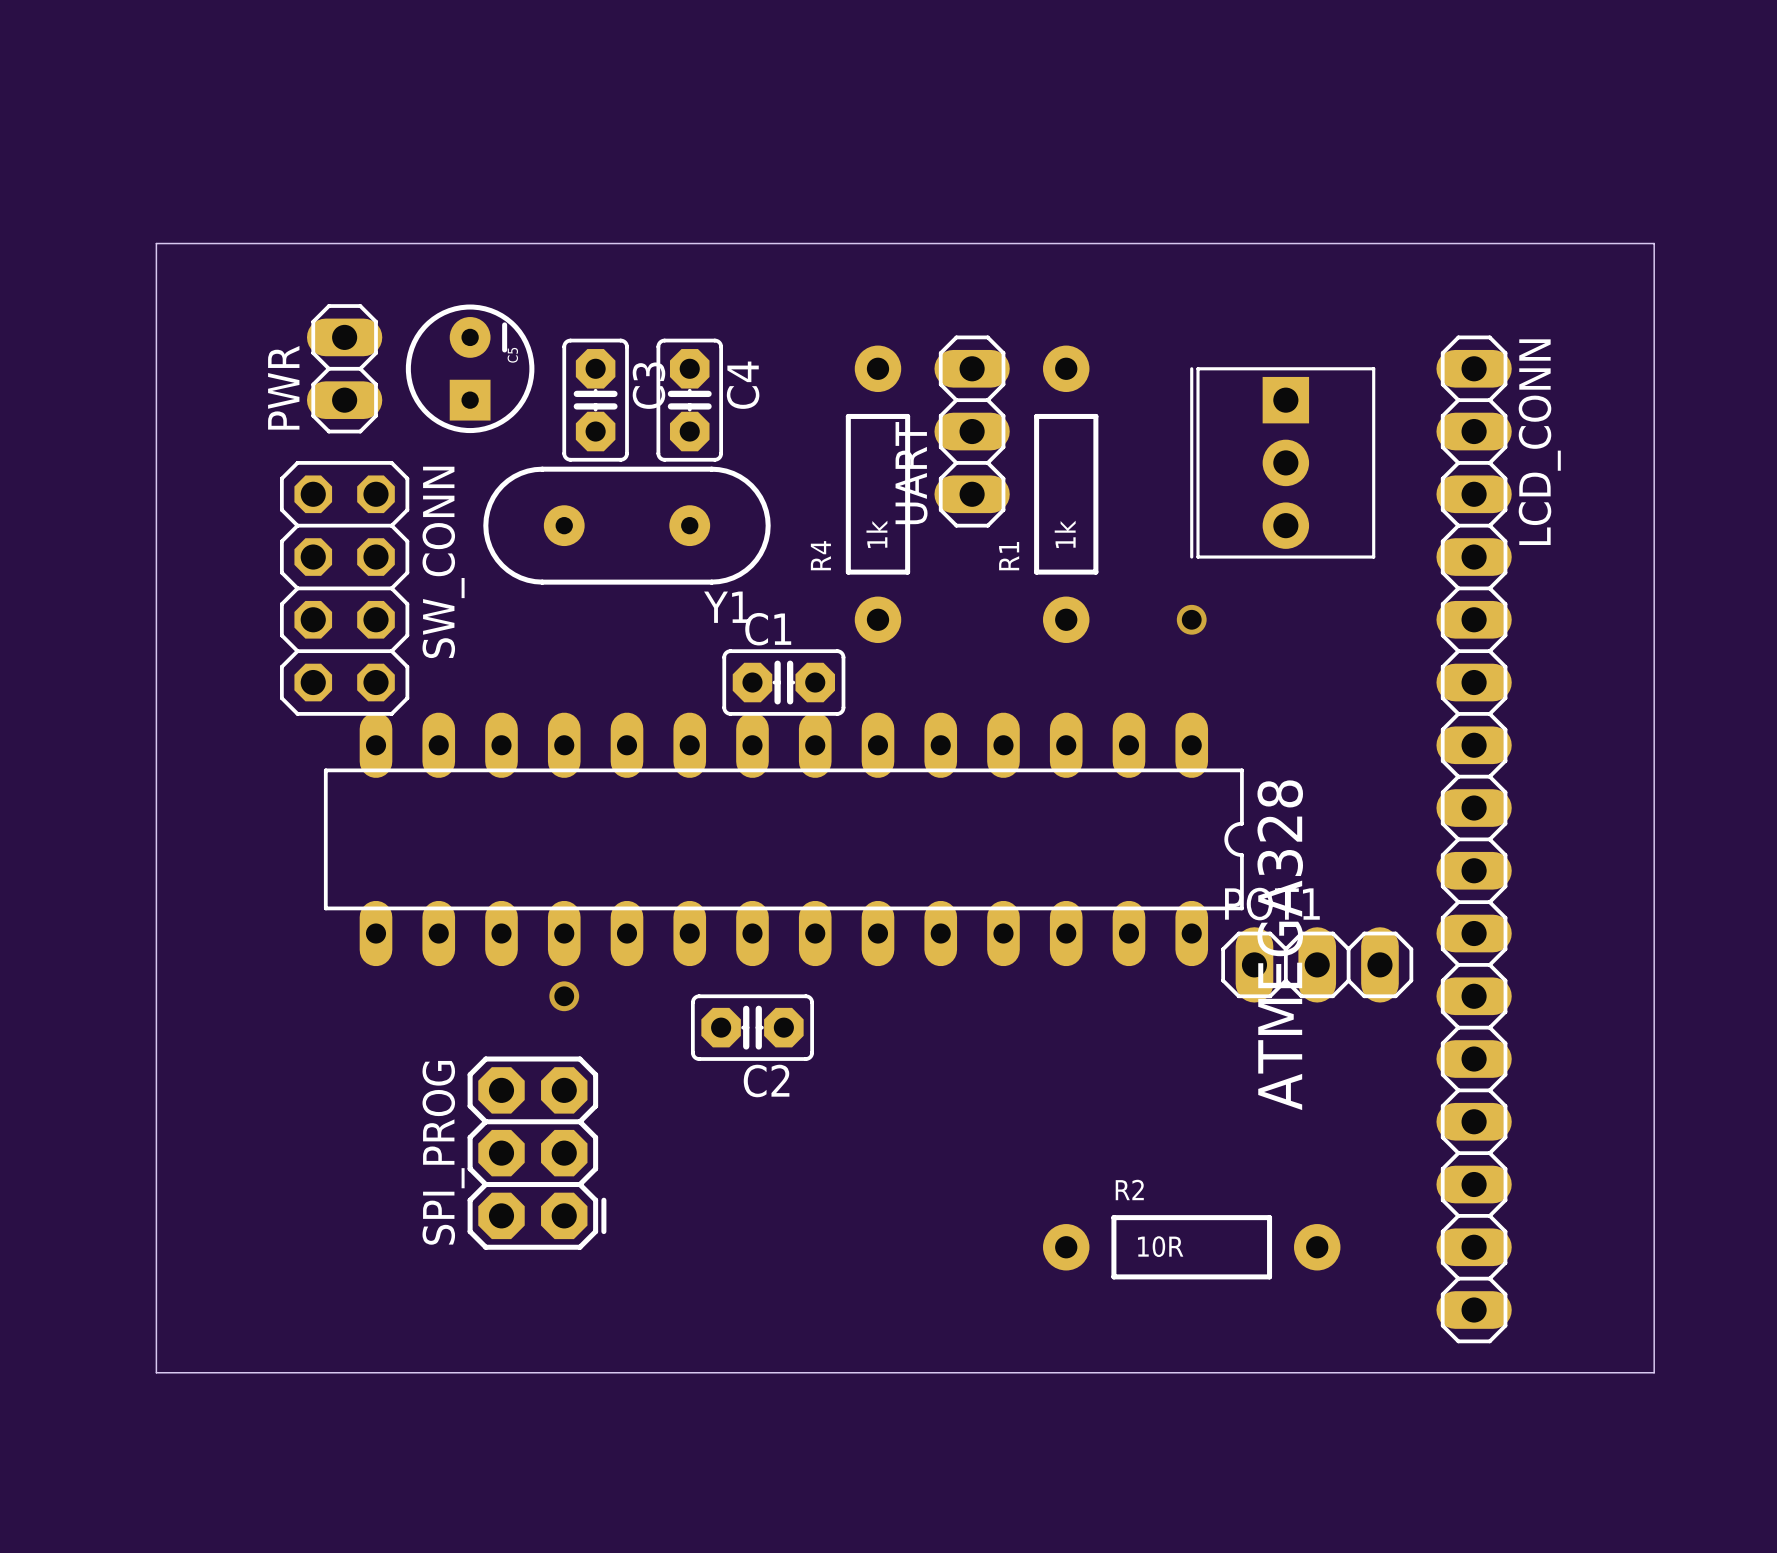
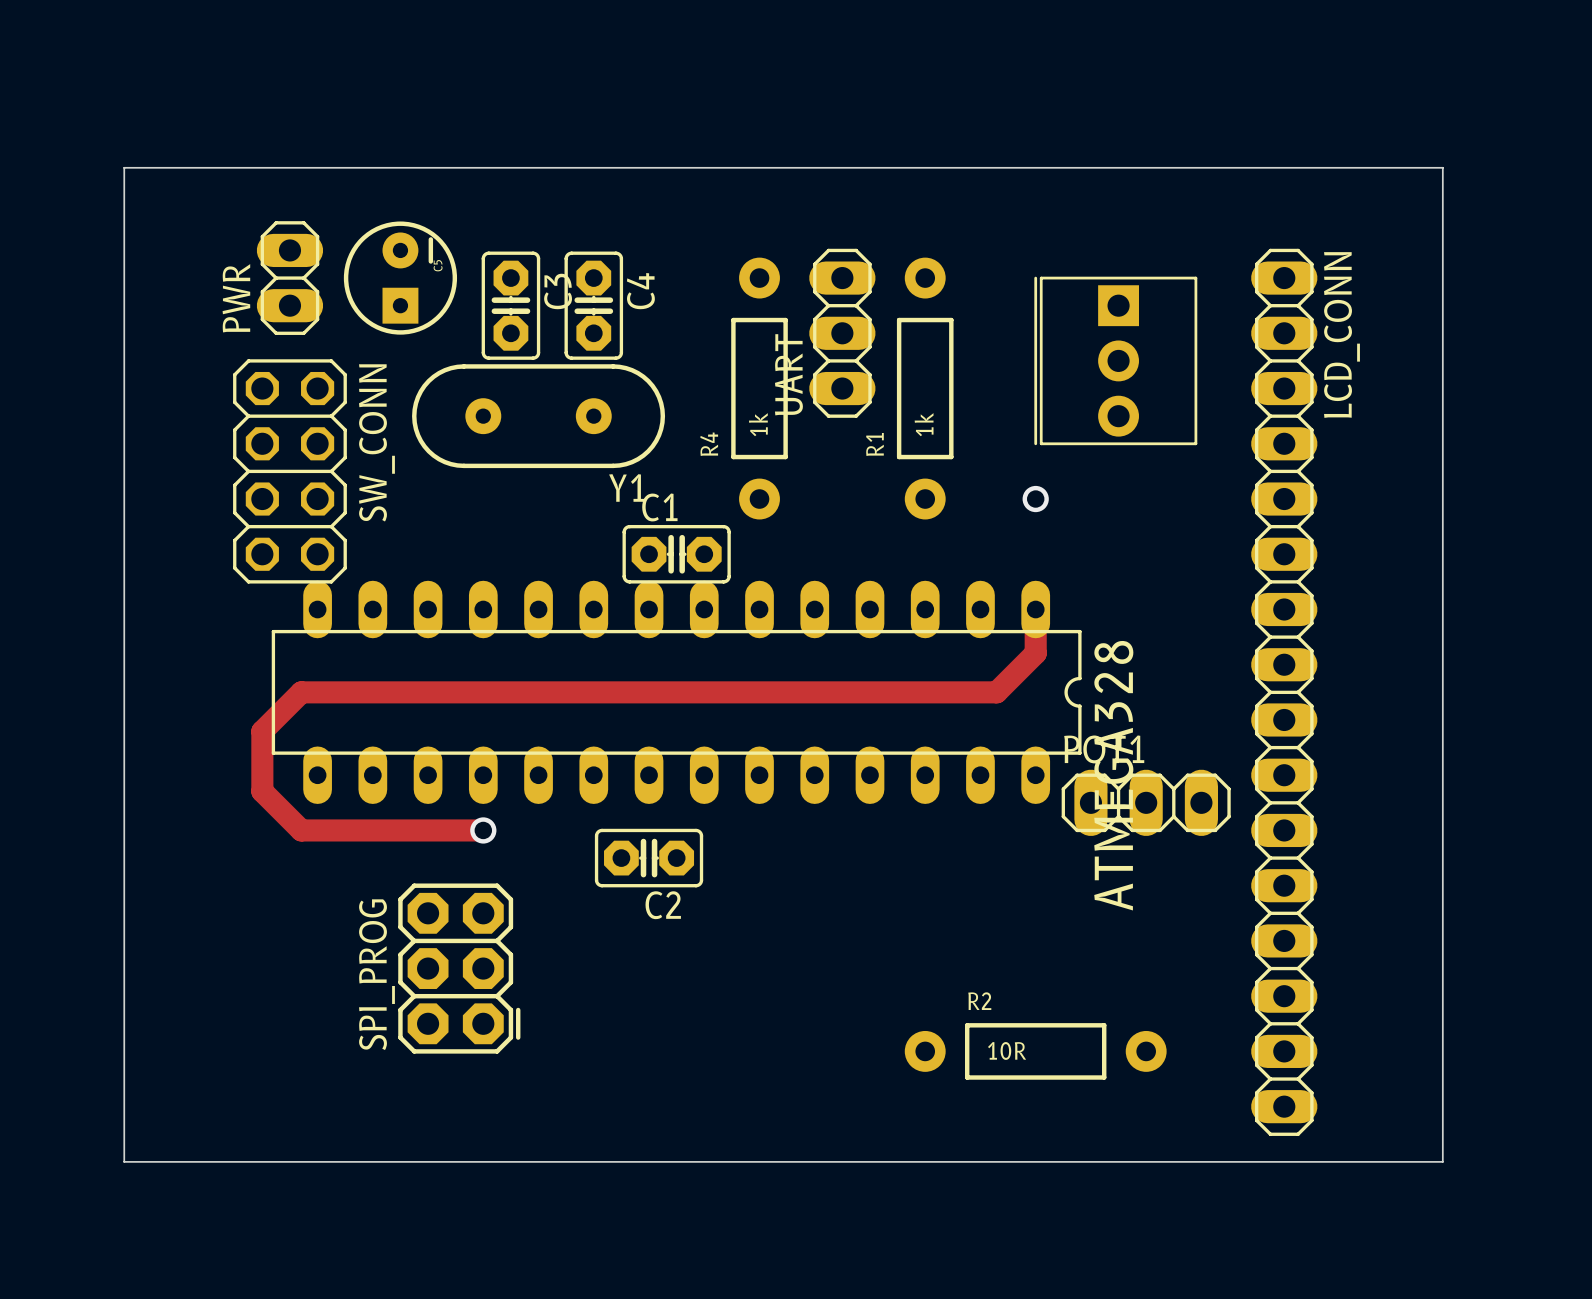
track: none -> (1035, 609) (1035, 653) (996, 692) (301, 692) (262, 731) (262, 791) (301, 830) (483, 830)

